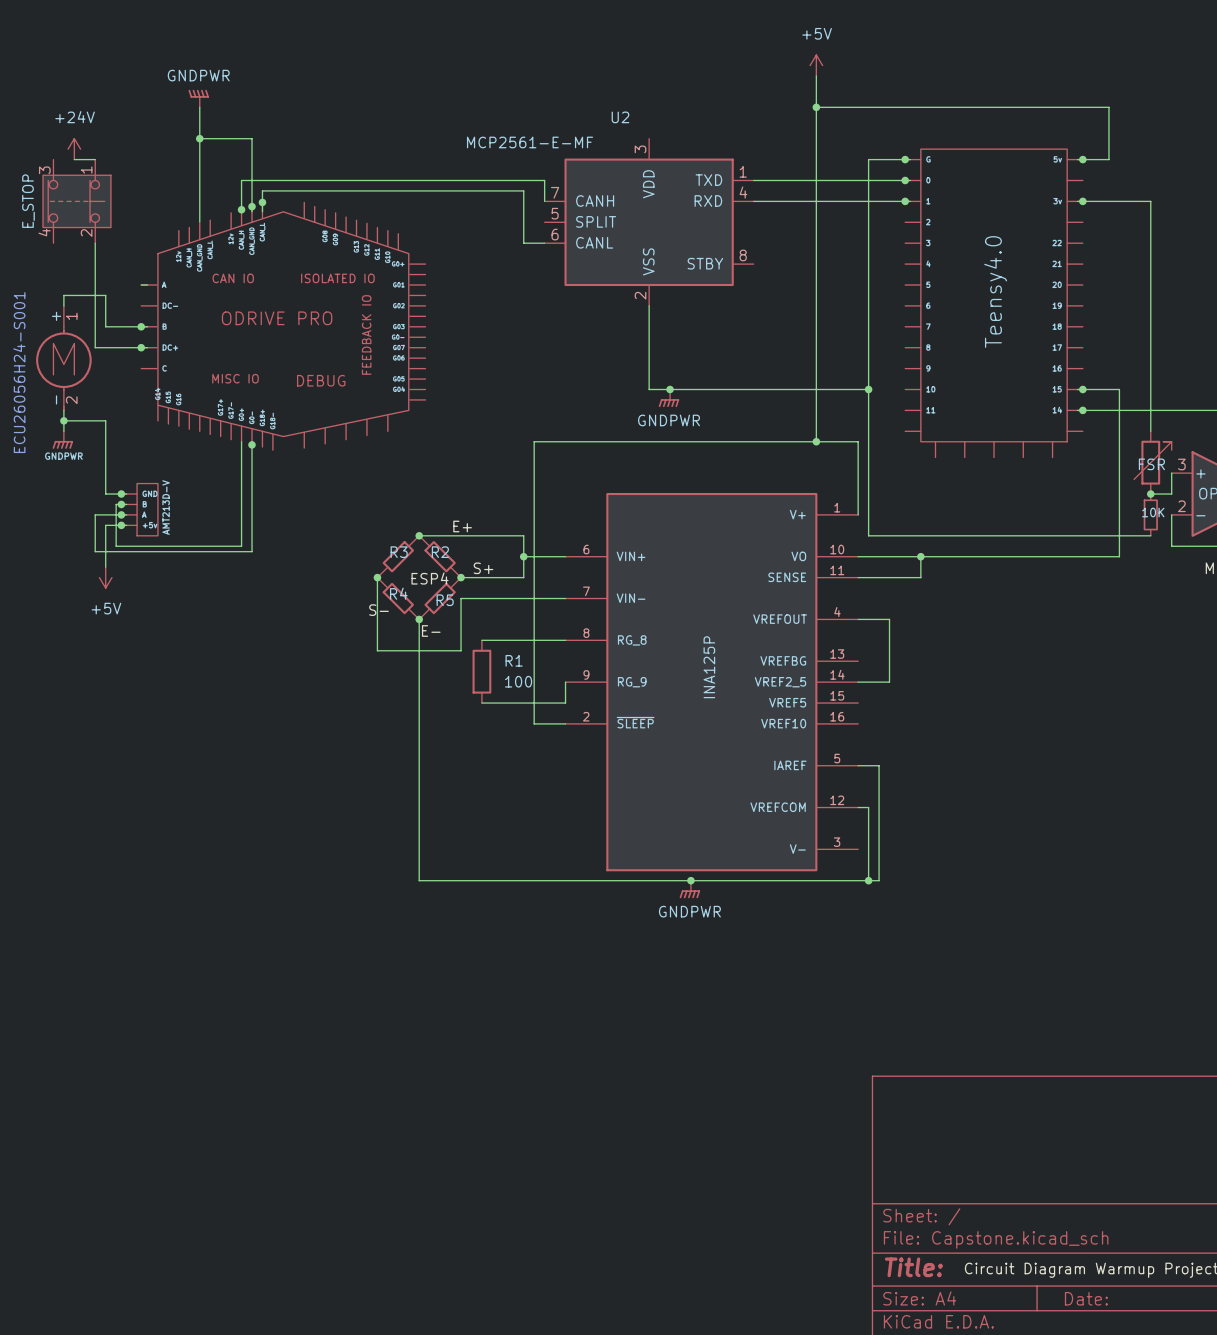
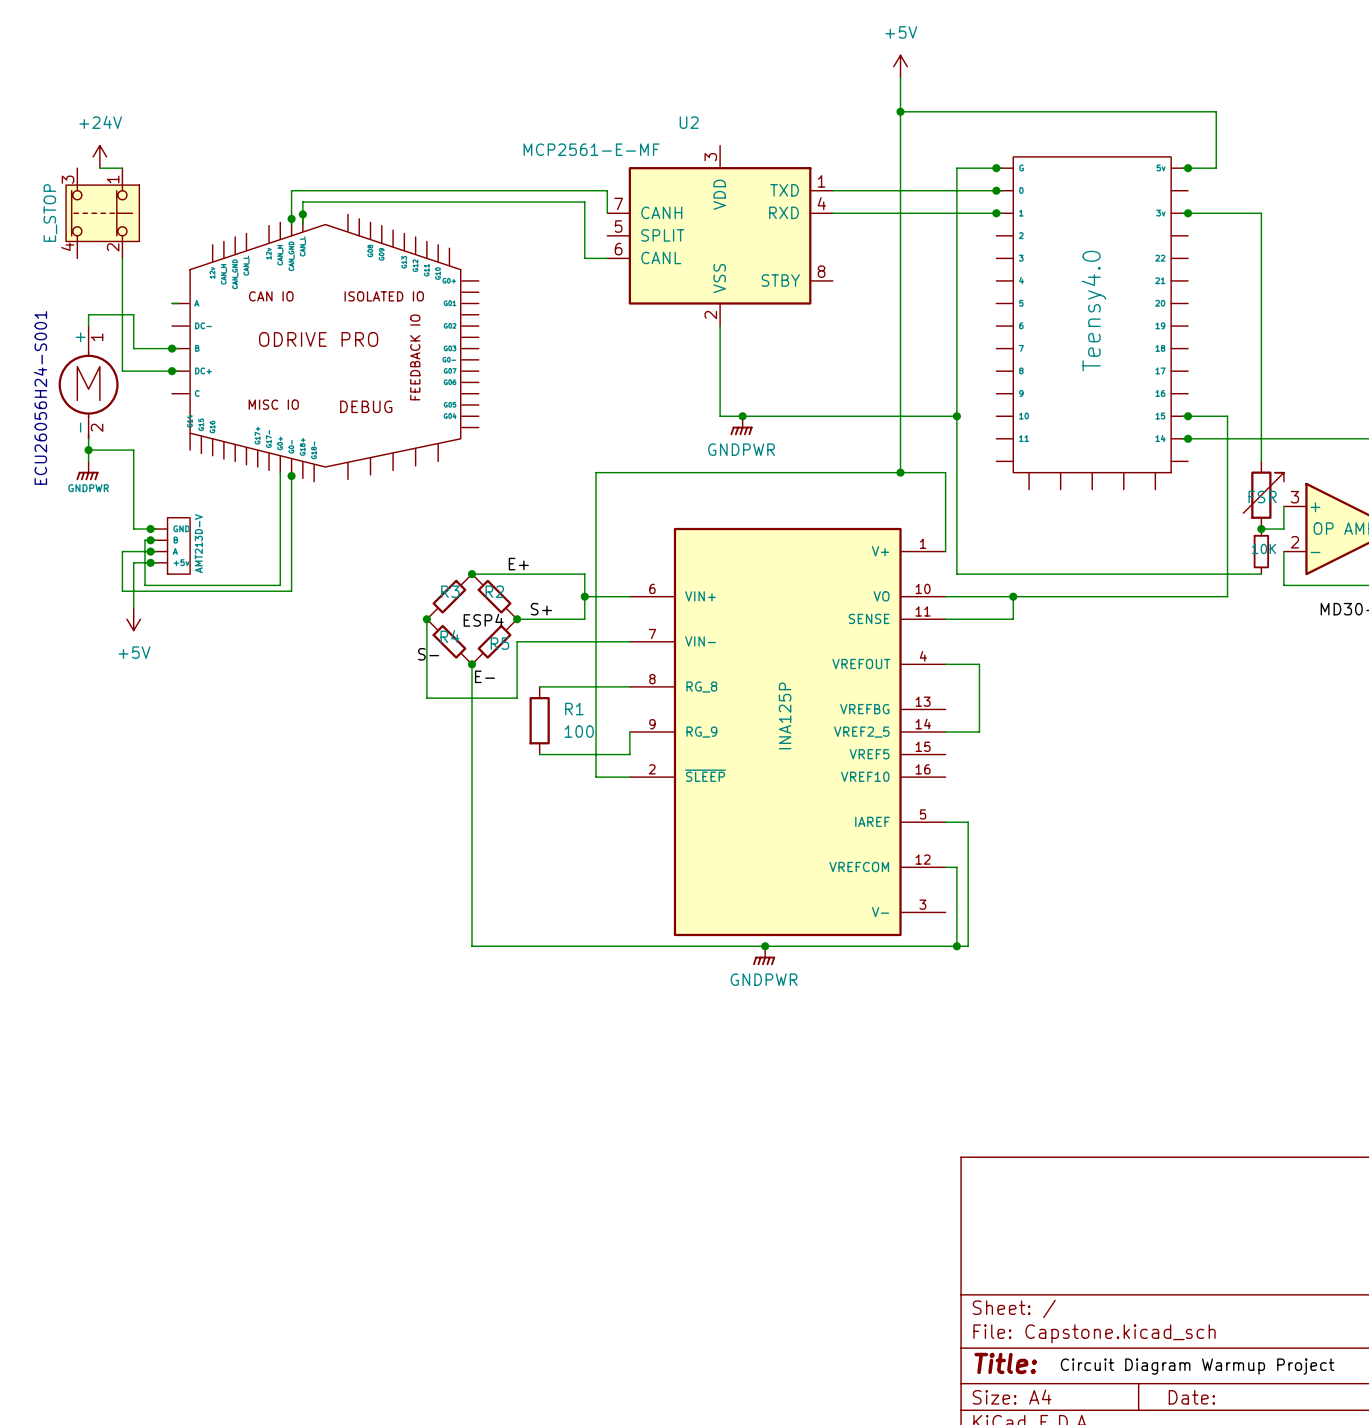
power symbol: GNDPWR (198, 98) -> none
wire: (199, 107) (199, 222) -> none
wire: (199, 138) (252, 138) (252, 180) (241, 180) (241, 211) -> none
junction: (199, 138) -> none
junction: (241, 209) -> none

